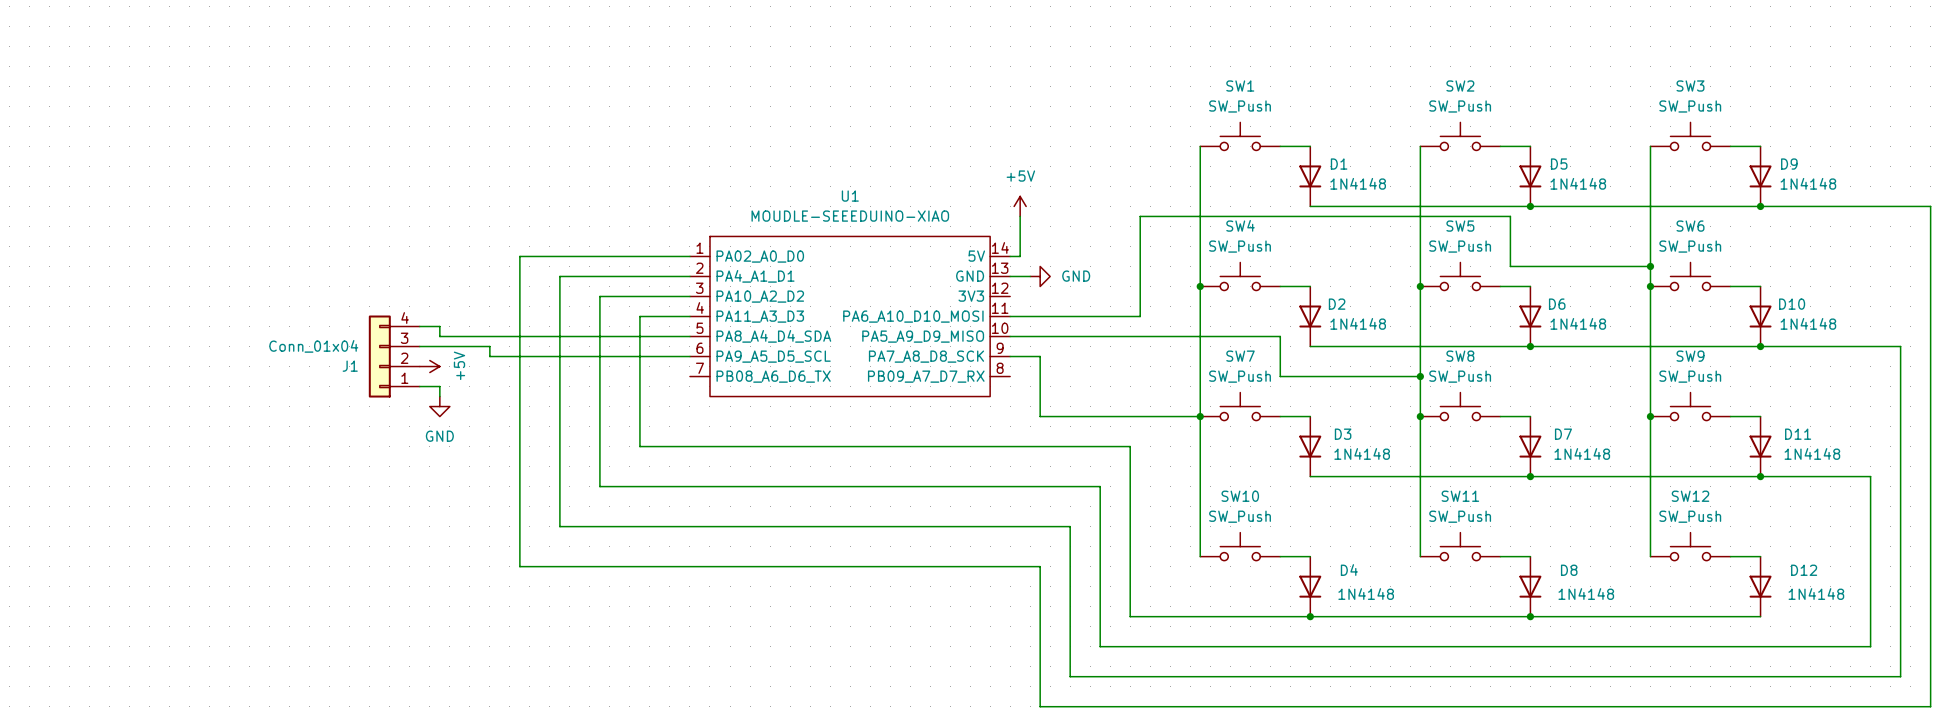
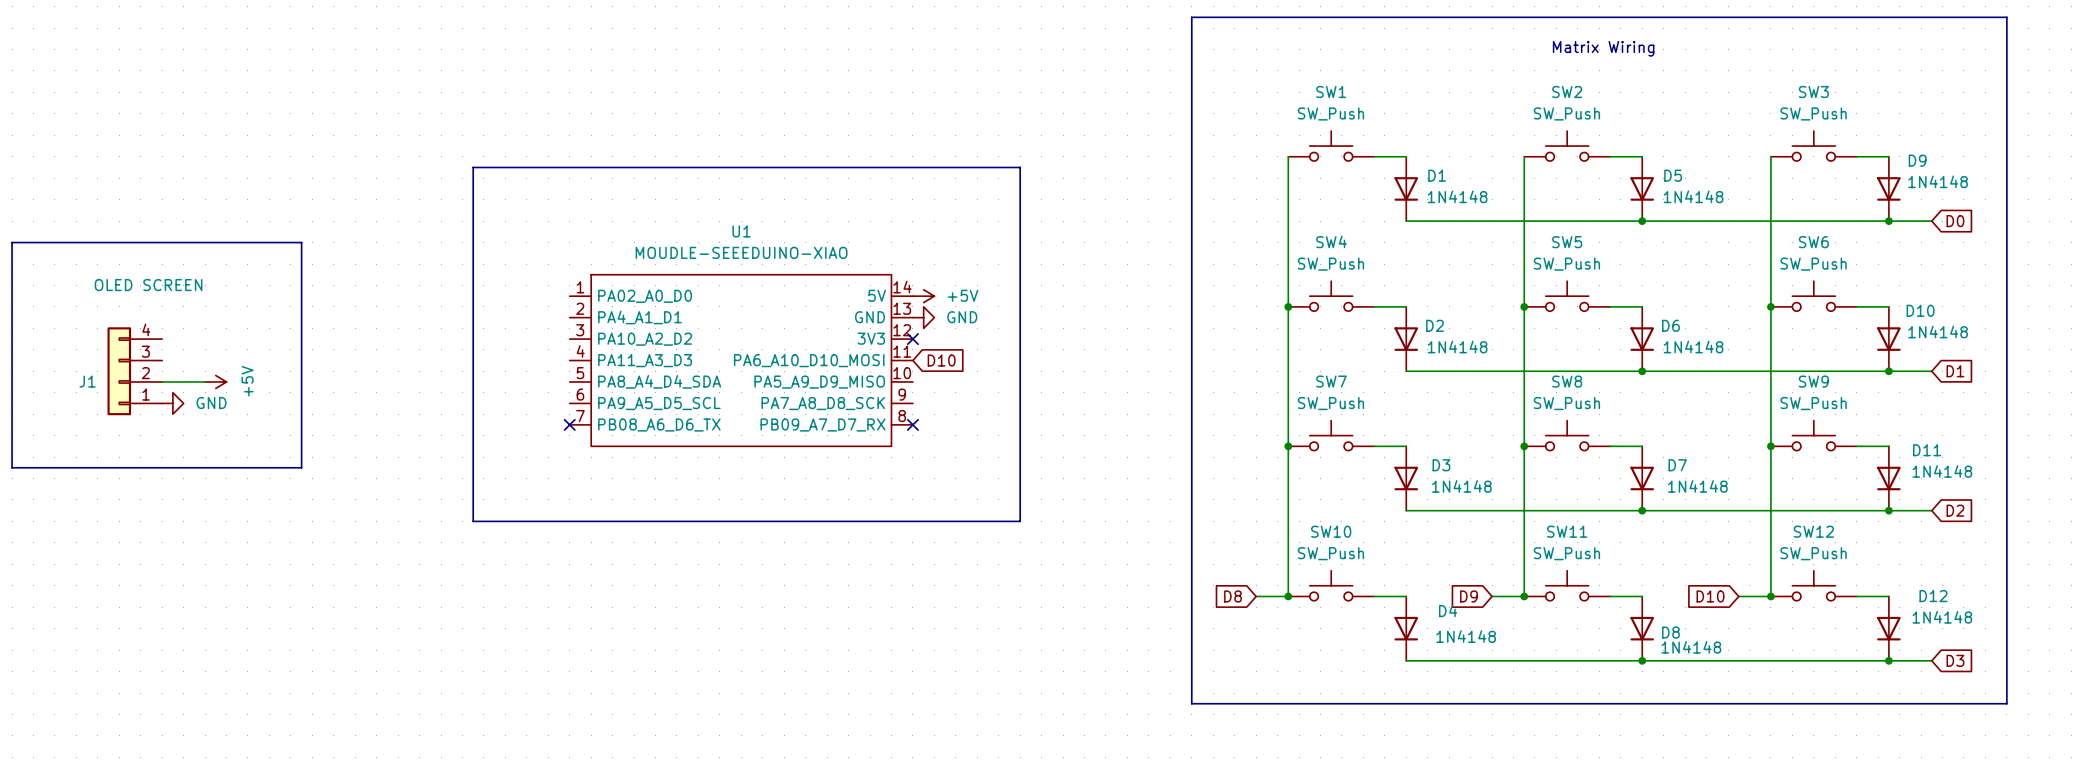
line: none -> (1191, 17) (2006, 17) (2006, 703) (1191, 703) (1191, 17)
text: none -> Matrix Wiring (1603, 48)
line: none -> (473, 167) (1020, 167) (1020, 521) (473, 521) (473, 167)
D9 name position: D9 (1789, 164) -> D9 (1917, 160)
D9 value position: 1N4148 (1808, 183) -> 1N4148 (1938, 181)
power symbol rotation: 0° (1020, 206) -> 90° clockwise (923, 296)
power symbol position: +5V (1020, 206) -> +5V (923, 296)
wire: (1800, 206) (1930, 206) (1930, 706) (1040, 706) (1040, 566) (519, 566) (519, 256) (689, 256) -> none
global label: none -> D0 (1955, 221)
wire: (1020, 216) (1020, 256) (1010, 256) -> none
line: none -> (12, 242) (301, 242) (301, 467) (12, 467) (12, 242)
wire: (1650, 266) (1510, 266) (1510, 216) (1140, 216) (1140, 316) (1010, 316) -> none
junction: (1650, 266) -> none
wire: (689, 276) (559, 276) (559, 526) (1070, 526) (1070, 676) (1900, 676) (1900, 346) (1800, 346) -> none
wire: (1010, 276) (1030, 276) -> none
power symbol position: GND (1040, 276) -> GND (923, 317)
wire: (689, 296) (599, 296) (599, 486) (1100, 486) (1100, 646) (1870, 646) (1870, 476) (1800, 476) -> none
D10 name position: D10 (1792, 304) -> D10 (1920, 310)
wire: (689, 316) (639, 316) (639, 446) (1130, 446) (1130, 616) (1310, 616) -> none
U1 position: (850, 316) -> (741, 360)
no-connect mark: none -> (912, 339)
D10 value position: 1N4148 (1808, 323) -> 1N4148 (1938, 331)
wire: (419, 326) (439, 326) (439, 336) (689, 336) -> none
global label: none -> D10 (941, 360)
wire: (1010, 336) (1280, 336) (1280, 376) (1420, 376) -> none
J1 value: Conn_01x04 (313, 346) -> OLED SCREEN (148, 285)
wire: (419, 346) (489, 346) (489, 356) (689, 356) -> none
global label: none -> D1 (1955, 371)
wire: none -> (162, 381) (205, 381)
power symbol: none -> +5V (215, 381)
J1 position: (394, 356) -> (134, 371)
wire: (1010, 356) (1040, 356) (1040, 416) (1200, 416) -> none
power symbol: +5V (429, 366) -> none
power symbol: none -> GND (172, 403)
junction: (1420, 376) -> none
wire: (419, 386) (439, 386) (439, 396) -> none
no-connect mark: none -> (569, 424)
no-connect mark: none -> (912, 424)
power symbol: GND (439, 406) -> none
D11 name position: D11 (1798, 434) -> D11 (1927, 450)
D11 value position: 1N4148 (1812, 453) -> 1N4148 (1942, 471)
global label: none -> D2 (1955, 510)
global label: none -> D8 (1233, 596)
wire: none -> (1256, 596) (1288, 596)
junction: none -> (1288, 596)
global label: none -> D9 (1468, 596)
wire: none -> (1492, 596) (1524, 596)
junction: none -> (1524, 596)
global label: none -> D10 (1710, 596)
wire: none -> (1738, 596) (1770, 596)
junction: none -> (1770, 596)
D8 name position: D8 (1569, 570) -> D8 (1670, 632)
D12 name position: D12 (1804, 570) -> D12 (1933, 596)
D8 value position: 1N4148 (1586, 594) -> 1N4148 (1691, 647)
D12 value position: 1N4148 (1816, 594) -> 1N4148 (1942, 617)
junction: (1310, 616) -> none
wire: none -> (1888, 660) (1931, 660)
junction: none -> (1888, 660)
global label: none -> D3 (1955, 660)

